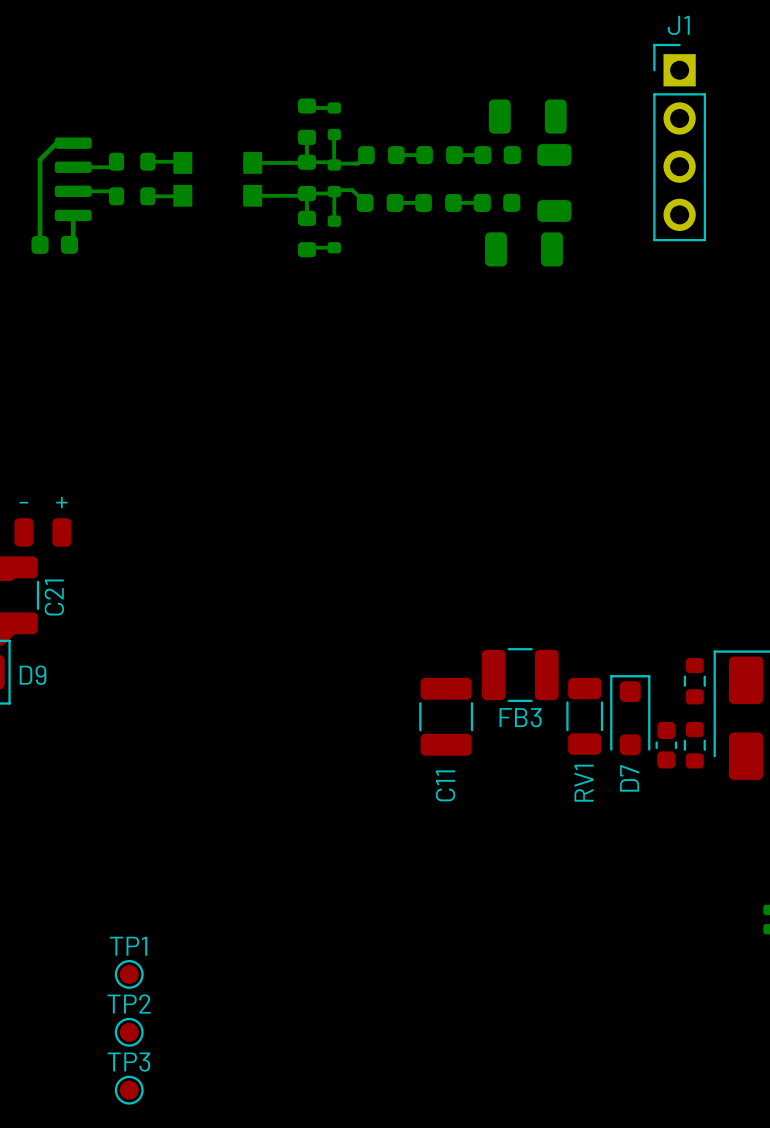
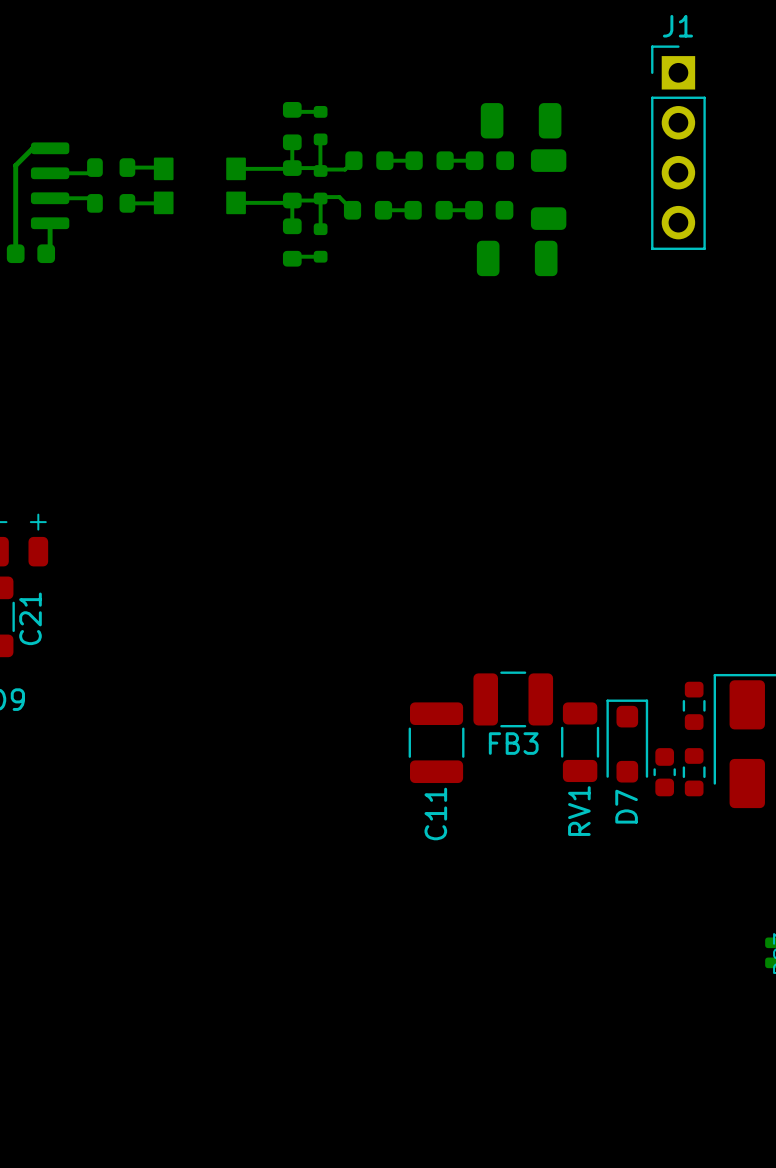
TP1: (129, 974) -> none
TP2: (129, 1032) -> none
TP3: (129, 1090) -> none

